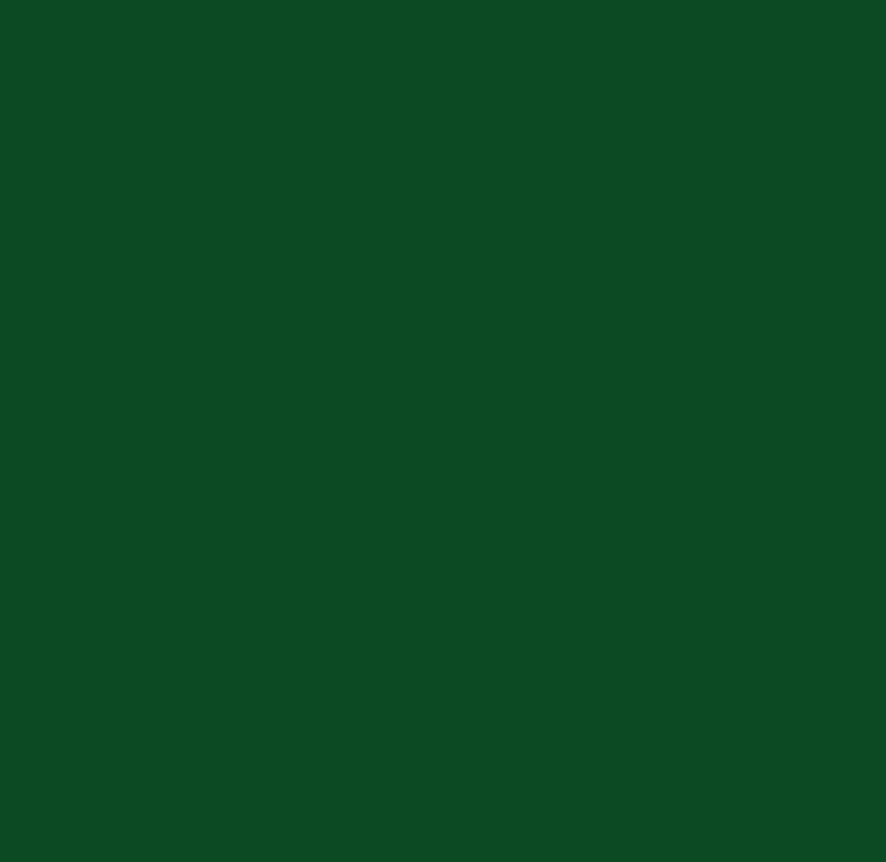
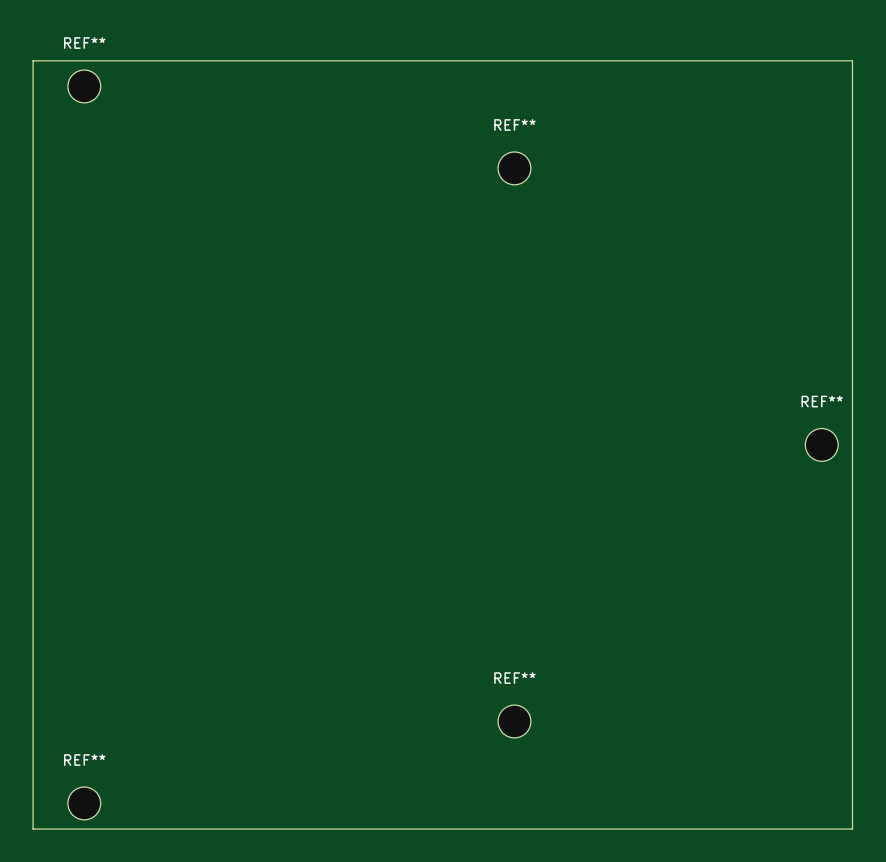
board edge: none -> (33, 60) (852, 60) (852, 829) (33, 829) (33, 60)
REF**: none -> (84, 86)
REF**: none -> (514, 168)
REF**: none -> (821, 444)
REF**: none -> (514, 721)
REF**: none -> (84, 803)

